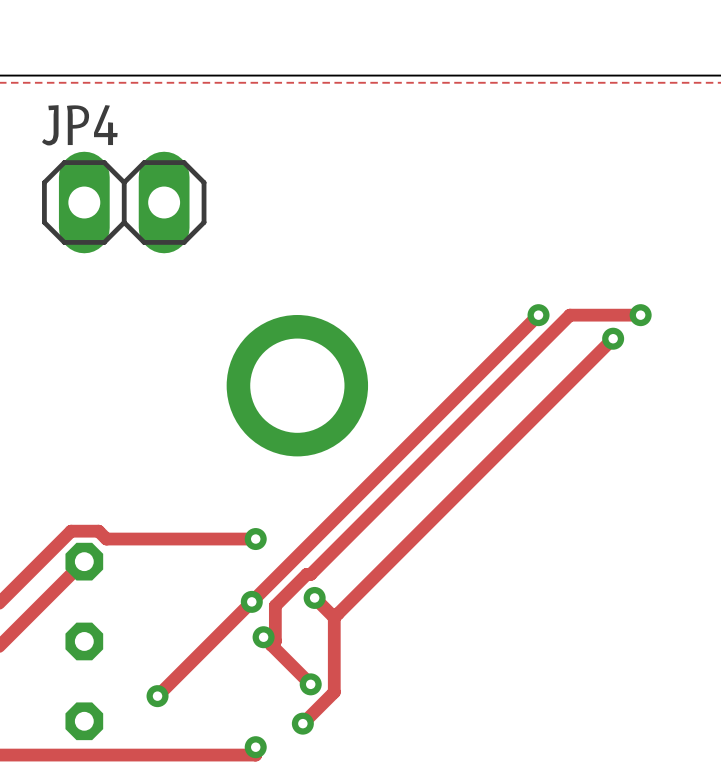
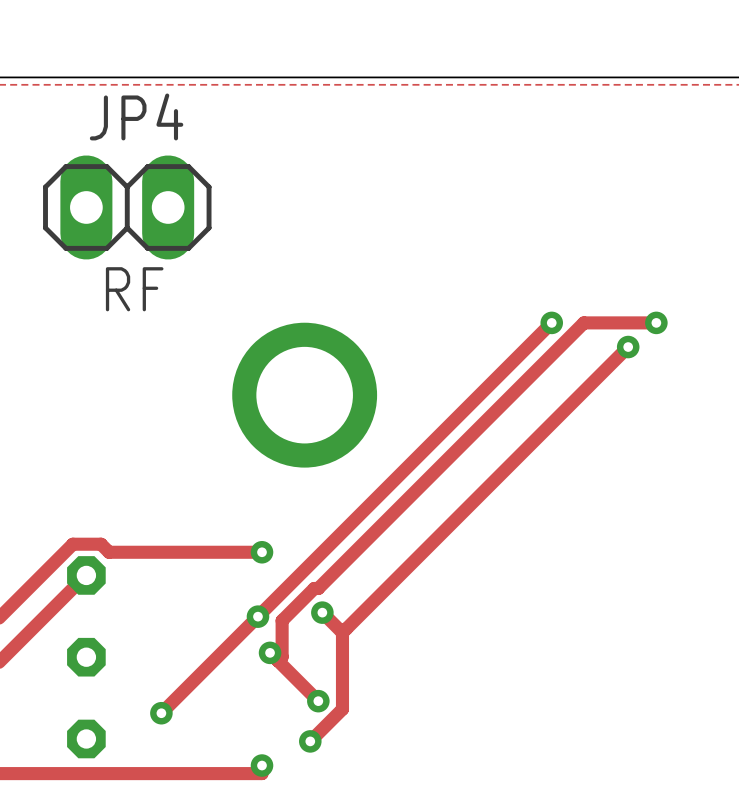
JP4 name position: JP4 (79, 125) -> JP4 (136, 116)
text: none -> RF (134, 289)

